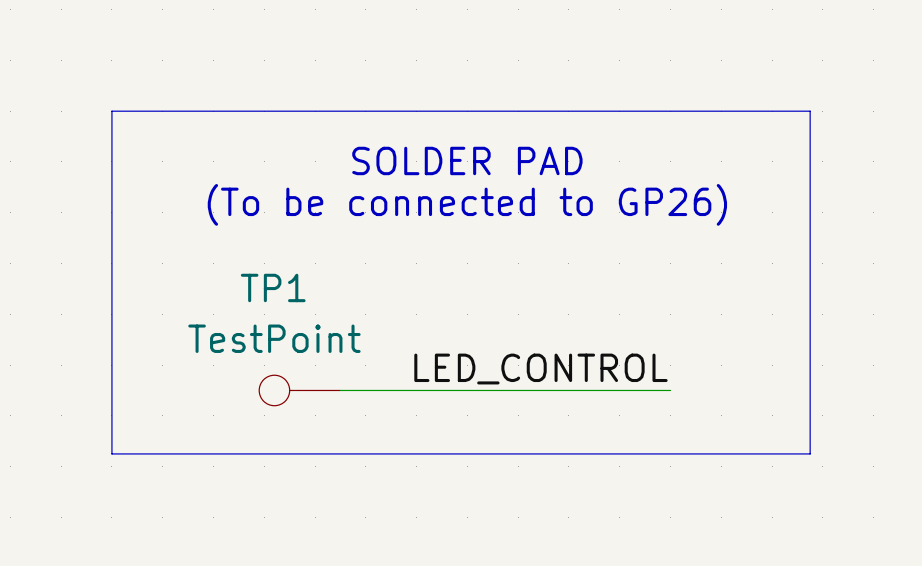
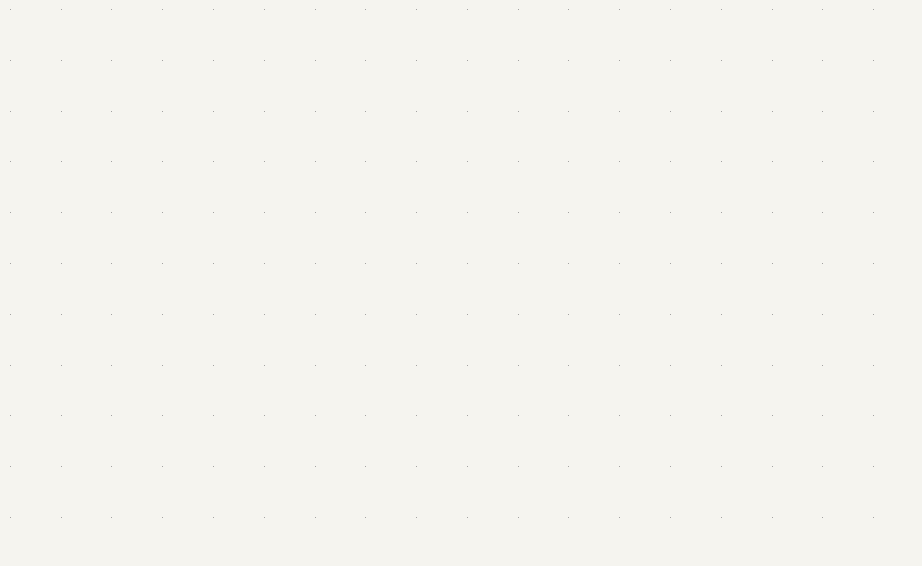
line: (111, 111) (810, 111) (810, 453) (111, 453) (111, 111) -> none
text: SOLDER PAD (467, 160) -> none
text: (To be connected to GP26) (467, 204) -> none
label: LED_CONTROL (540, 369) -> none
TP1: TestPoint (299, 390) -> none
wire: (340, 390) (670, 390) -> none

